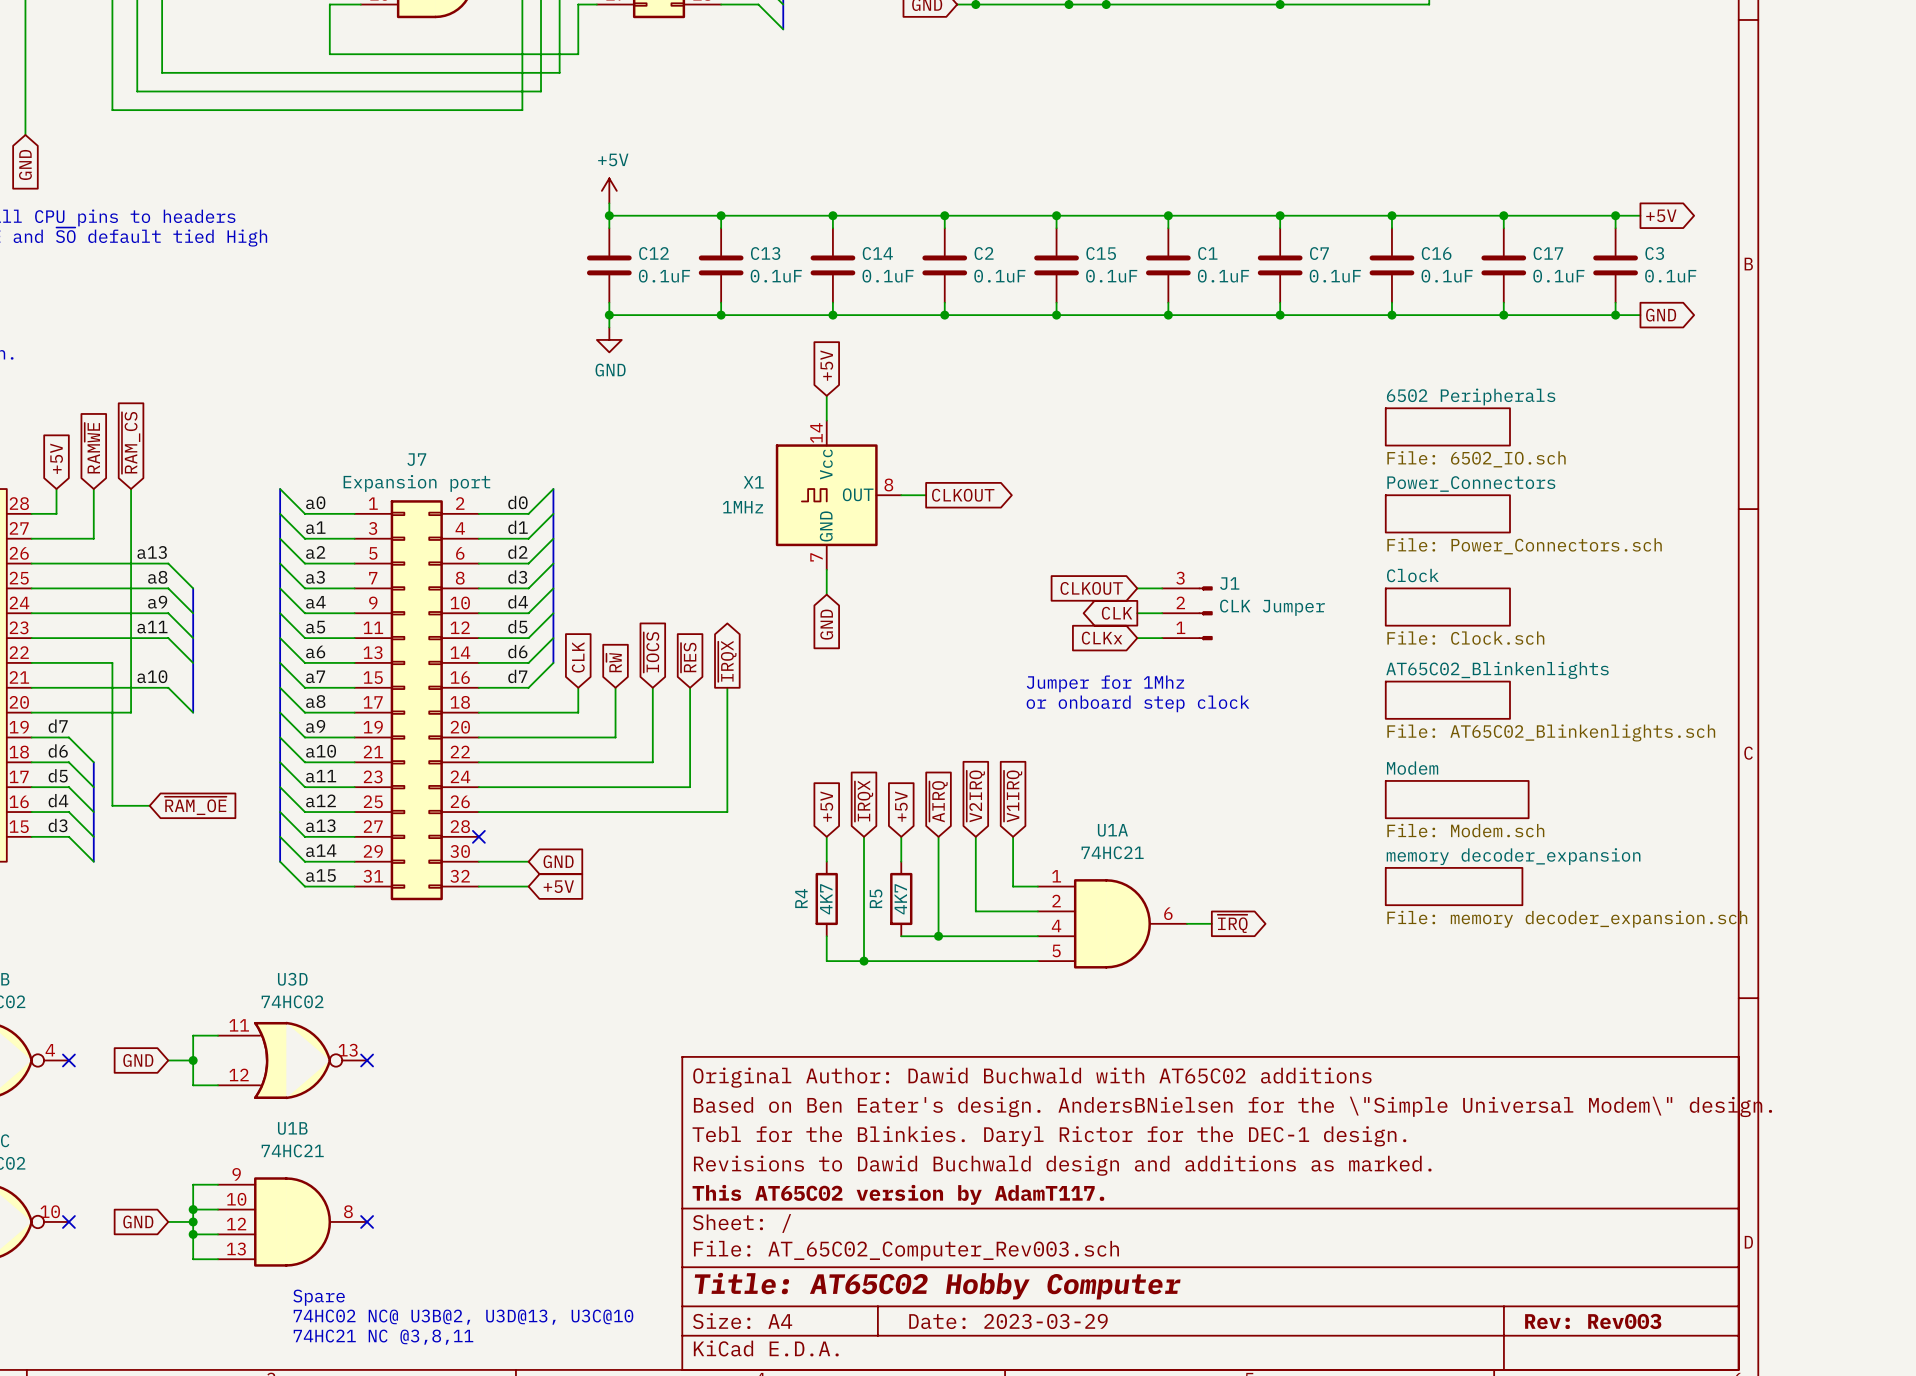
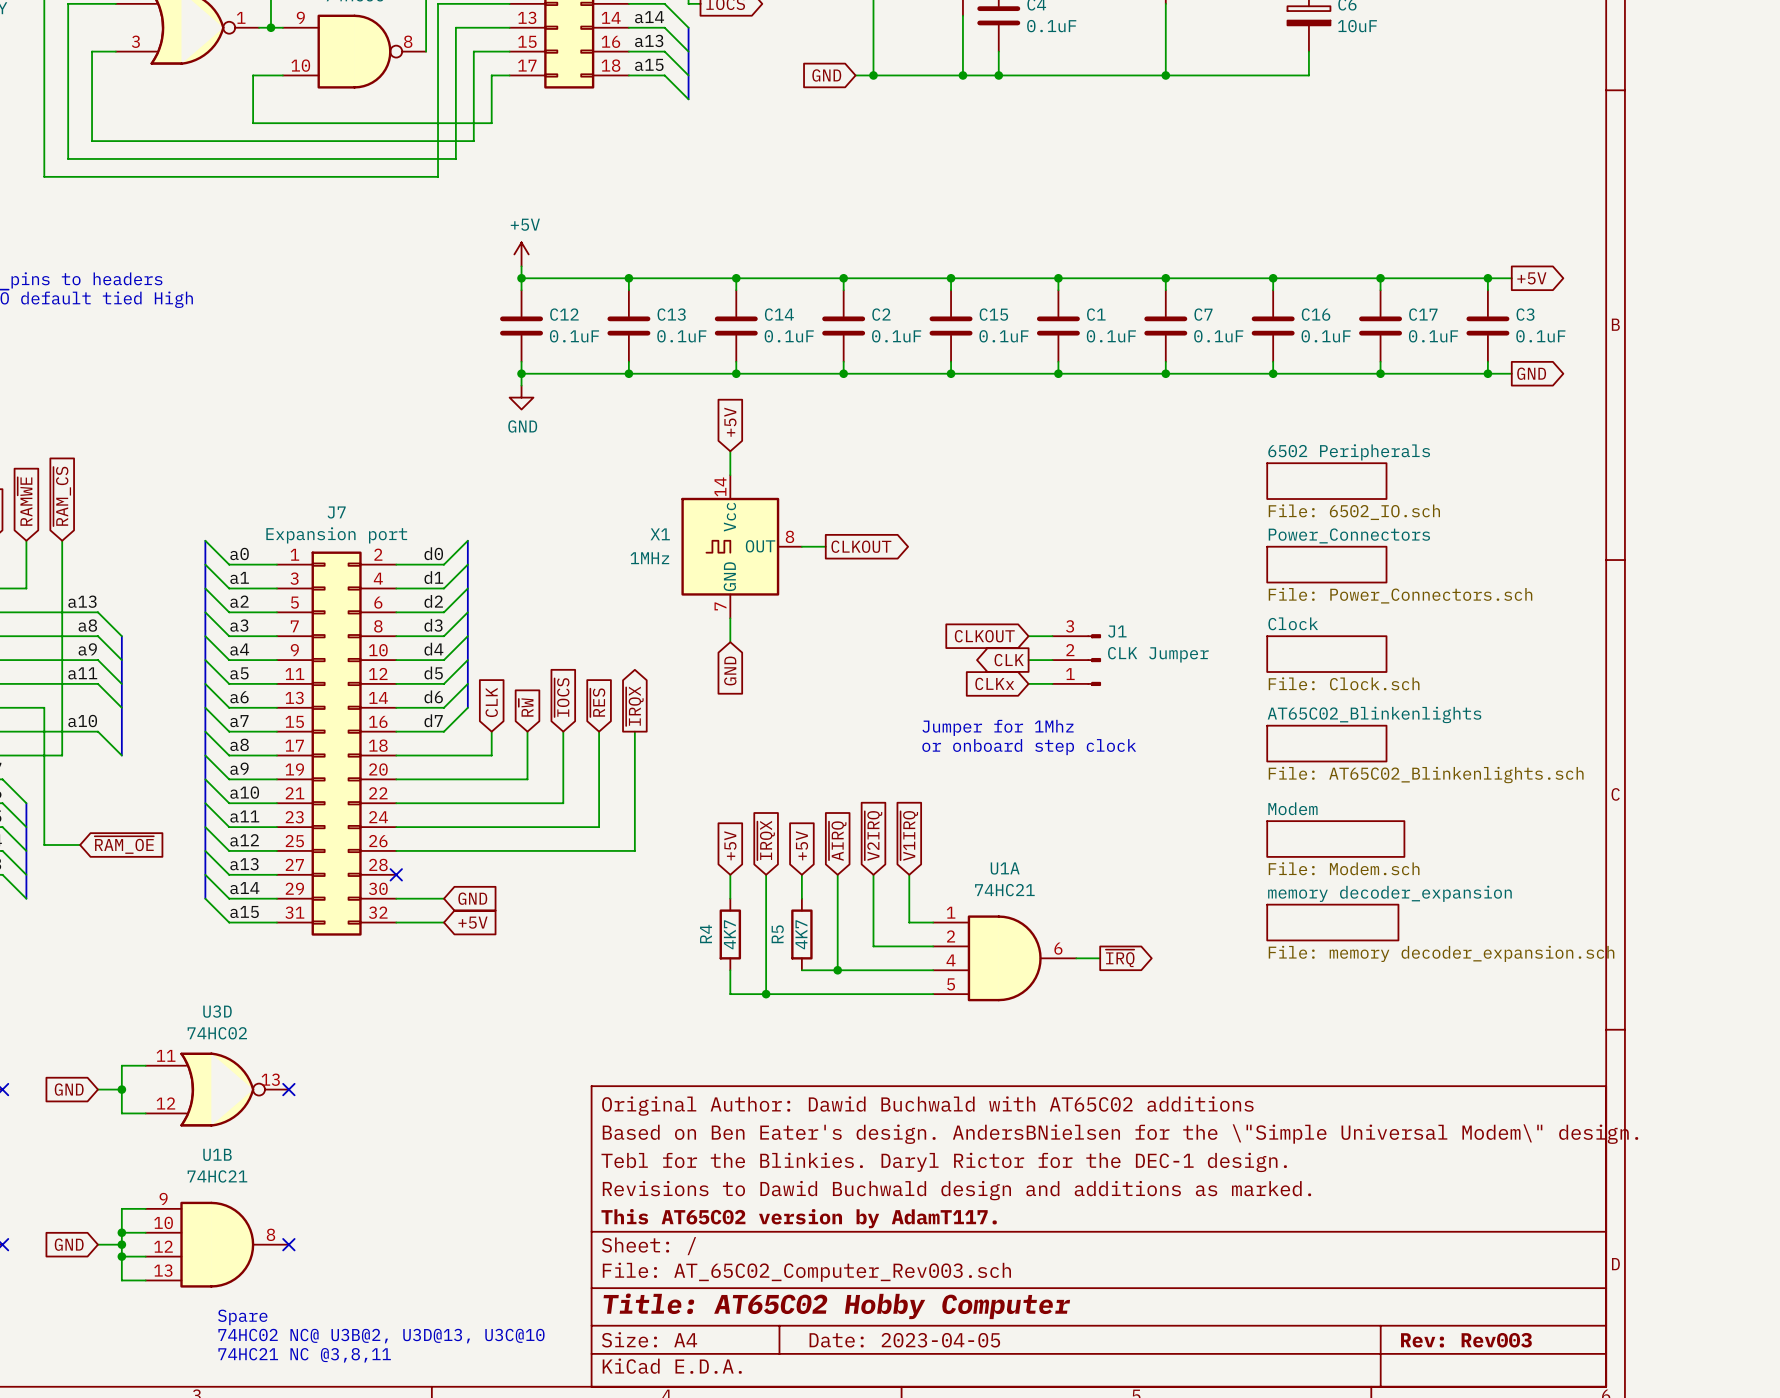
title block: Date: 2023-03-29 (1008, 1321) -> Date: 2023-04-05 (904, 1340)

